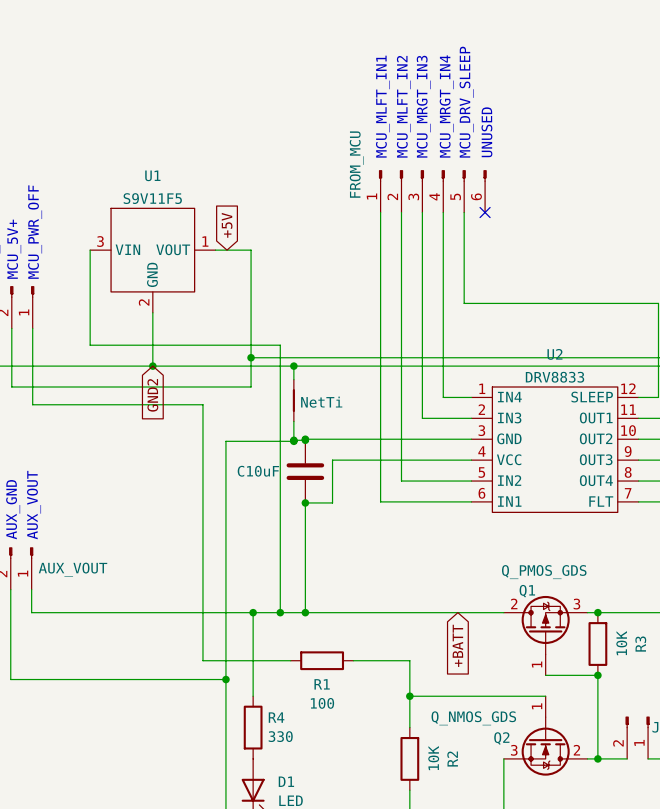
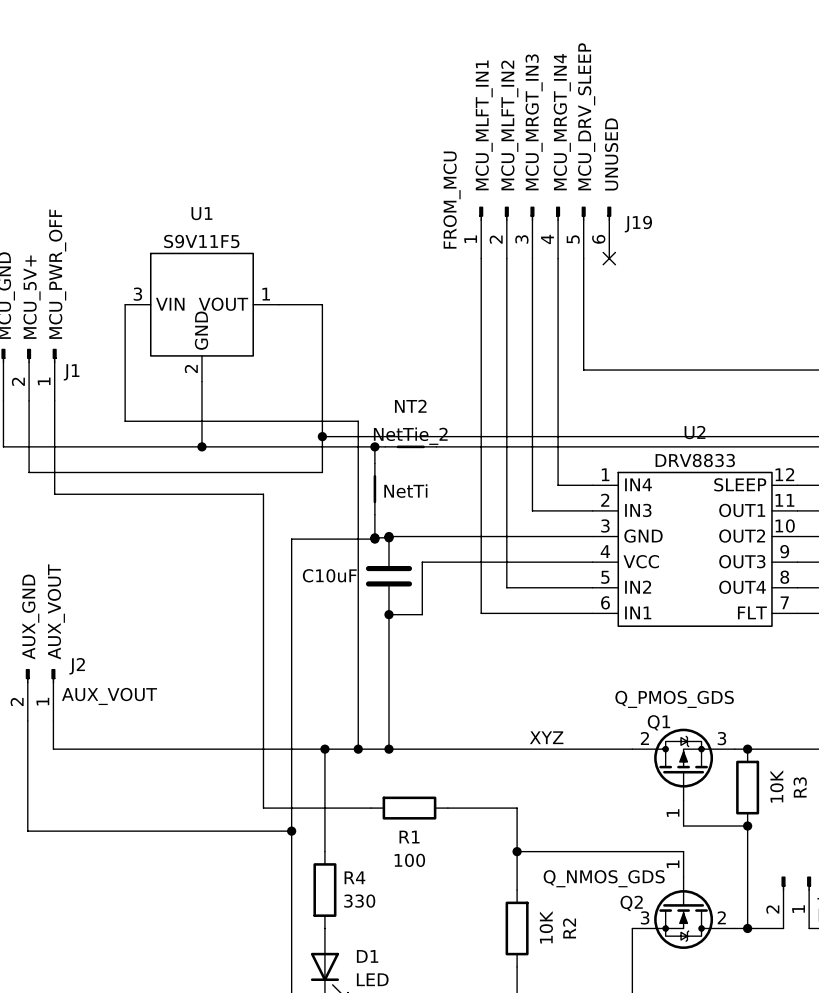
J19 name: none -> J19 (638, 224)
global label: +5V (227, 225) -> none
J1 name: none -> J1 (71, 372)
NT2: none -> NetTie_2 (410, 446)
global label: GND2 (152, 395) -> none
J2 name: none -> J2 (77, 666)
label: none -> XYZ (546, 737)
global label: +BATT (457, 645) -> none

